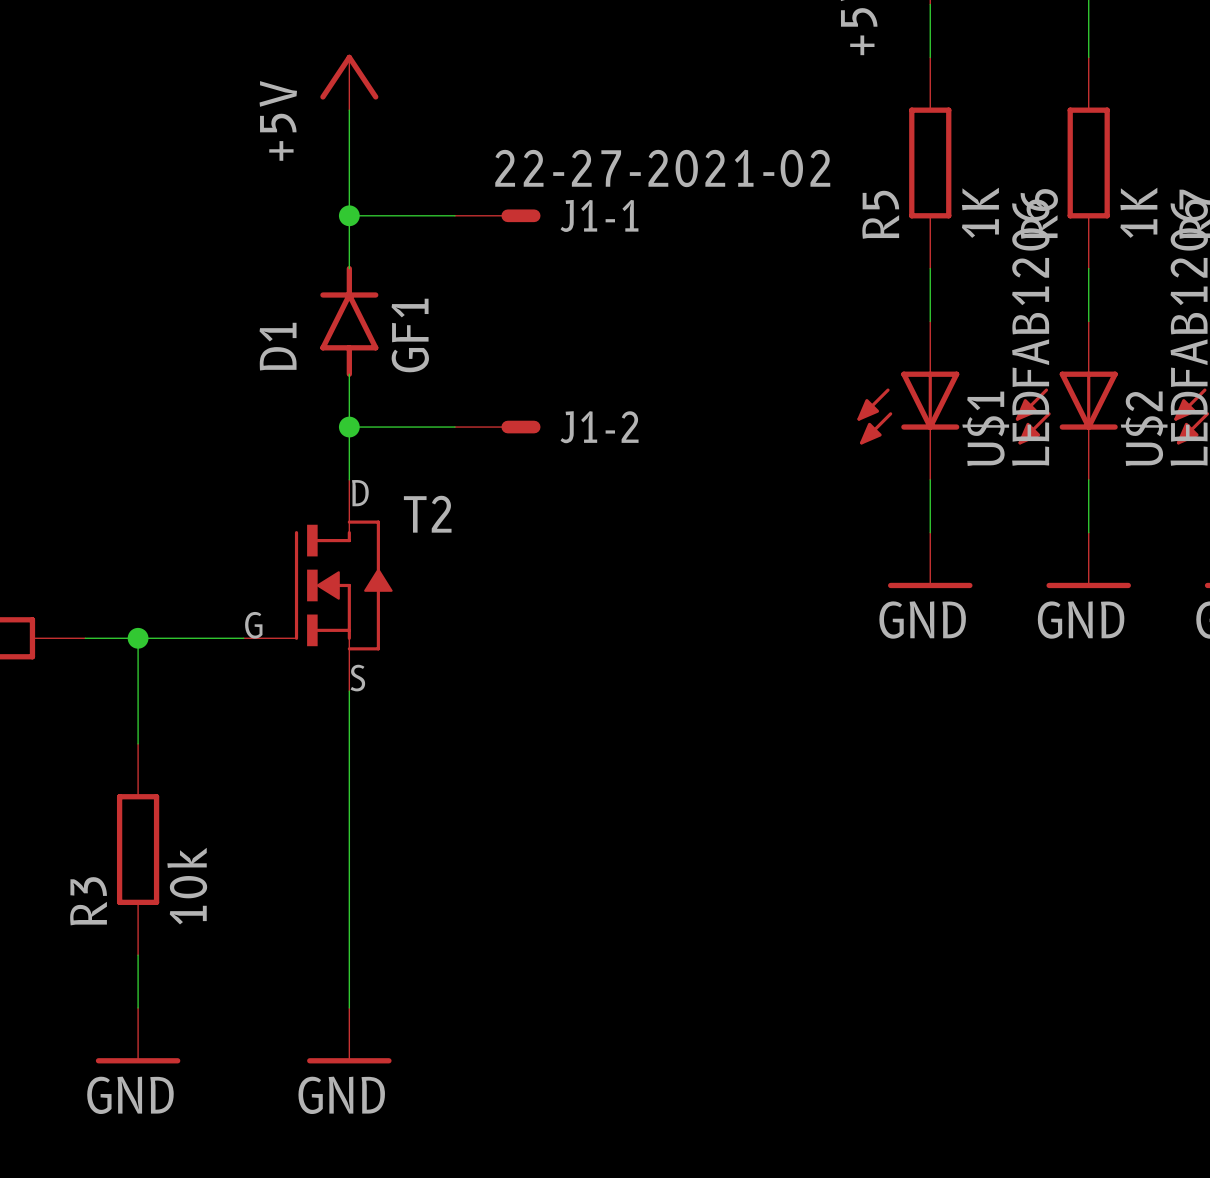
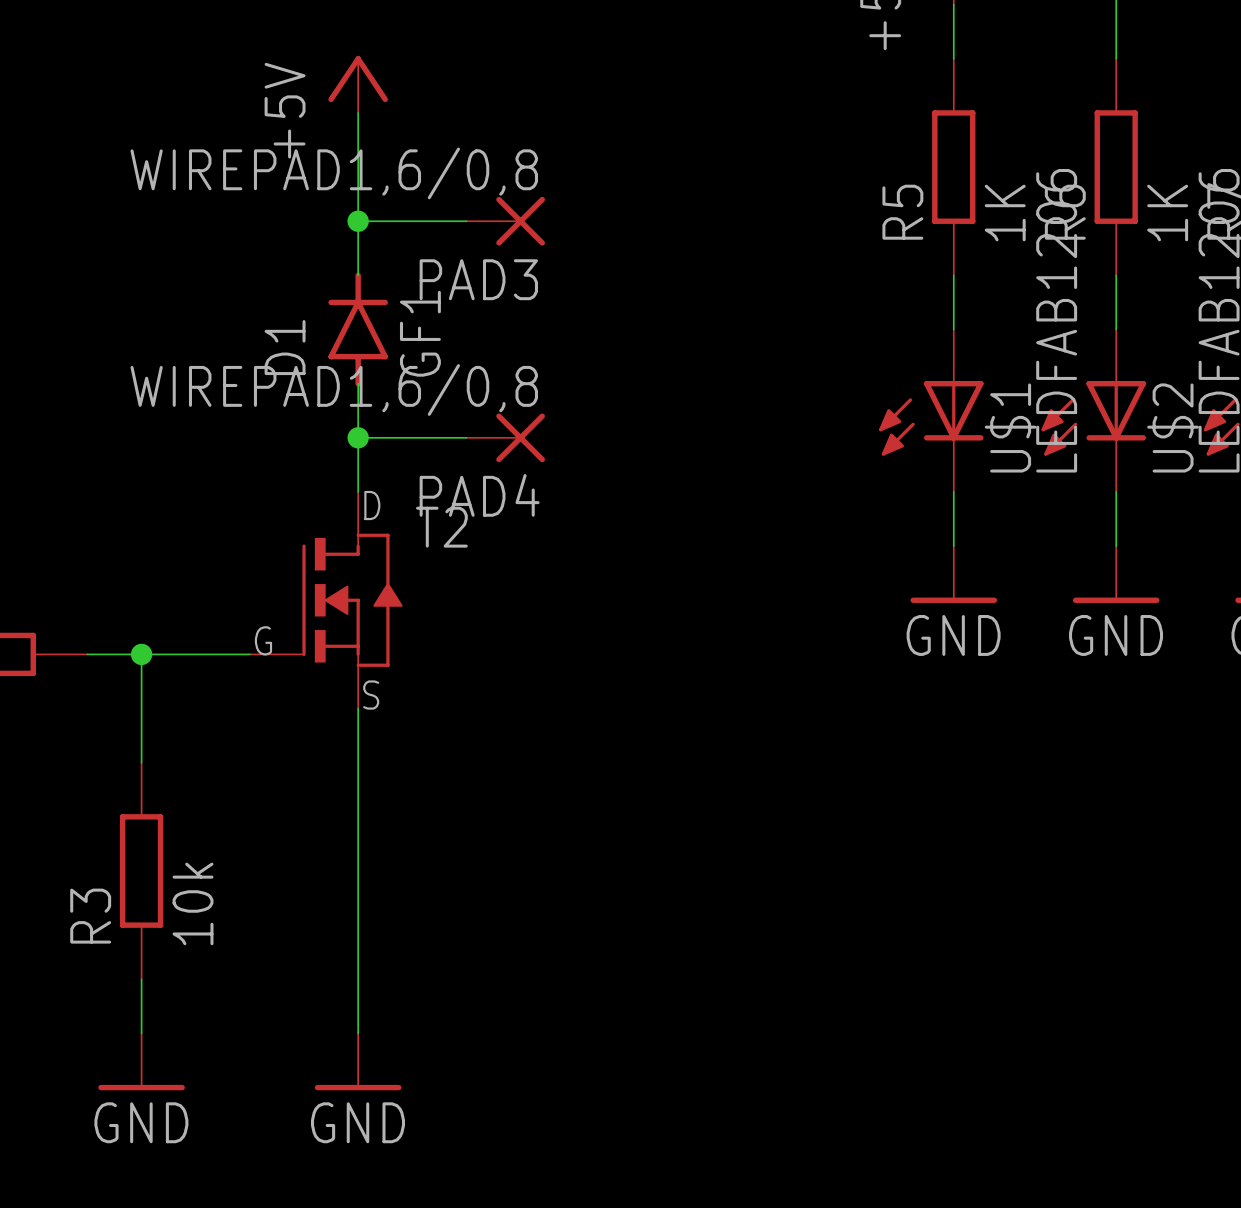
PAD3: none -> WIREPAD1,6/0,8 (505, 221)
J1-1: 22-27-2021-02 (497, 215) -> none
PAD4: none -> WIREPAD1,6/0,8 (505, 437)
J1-2: (497, 427) -> none

